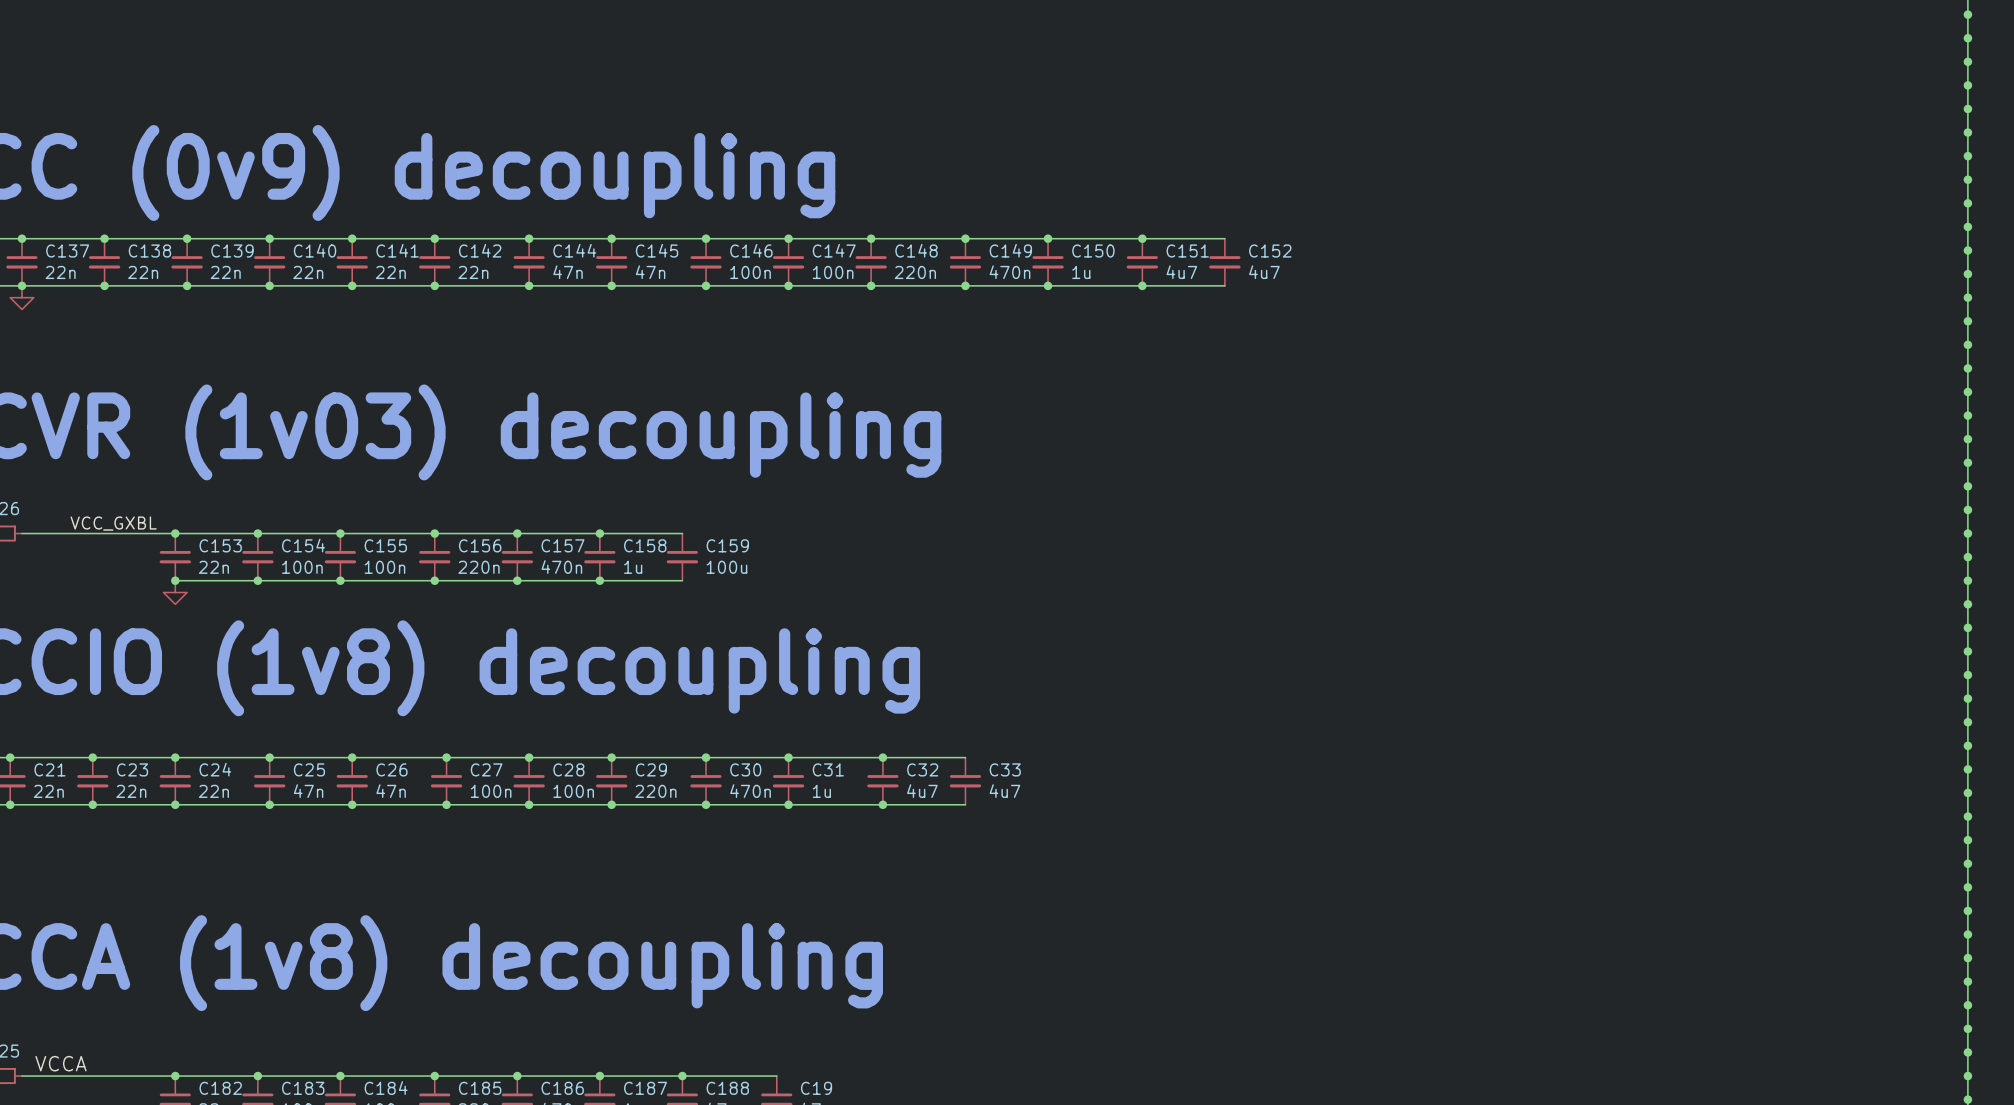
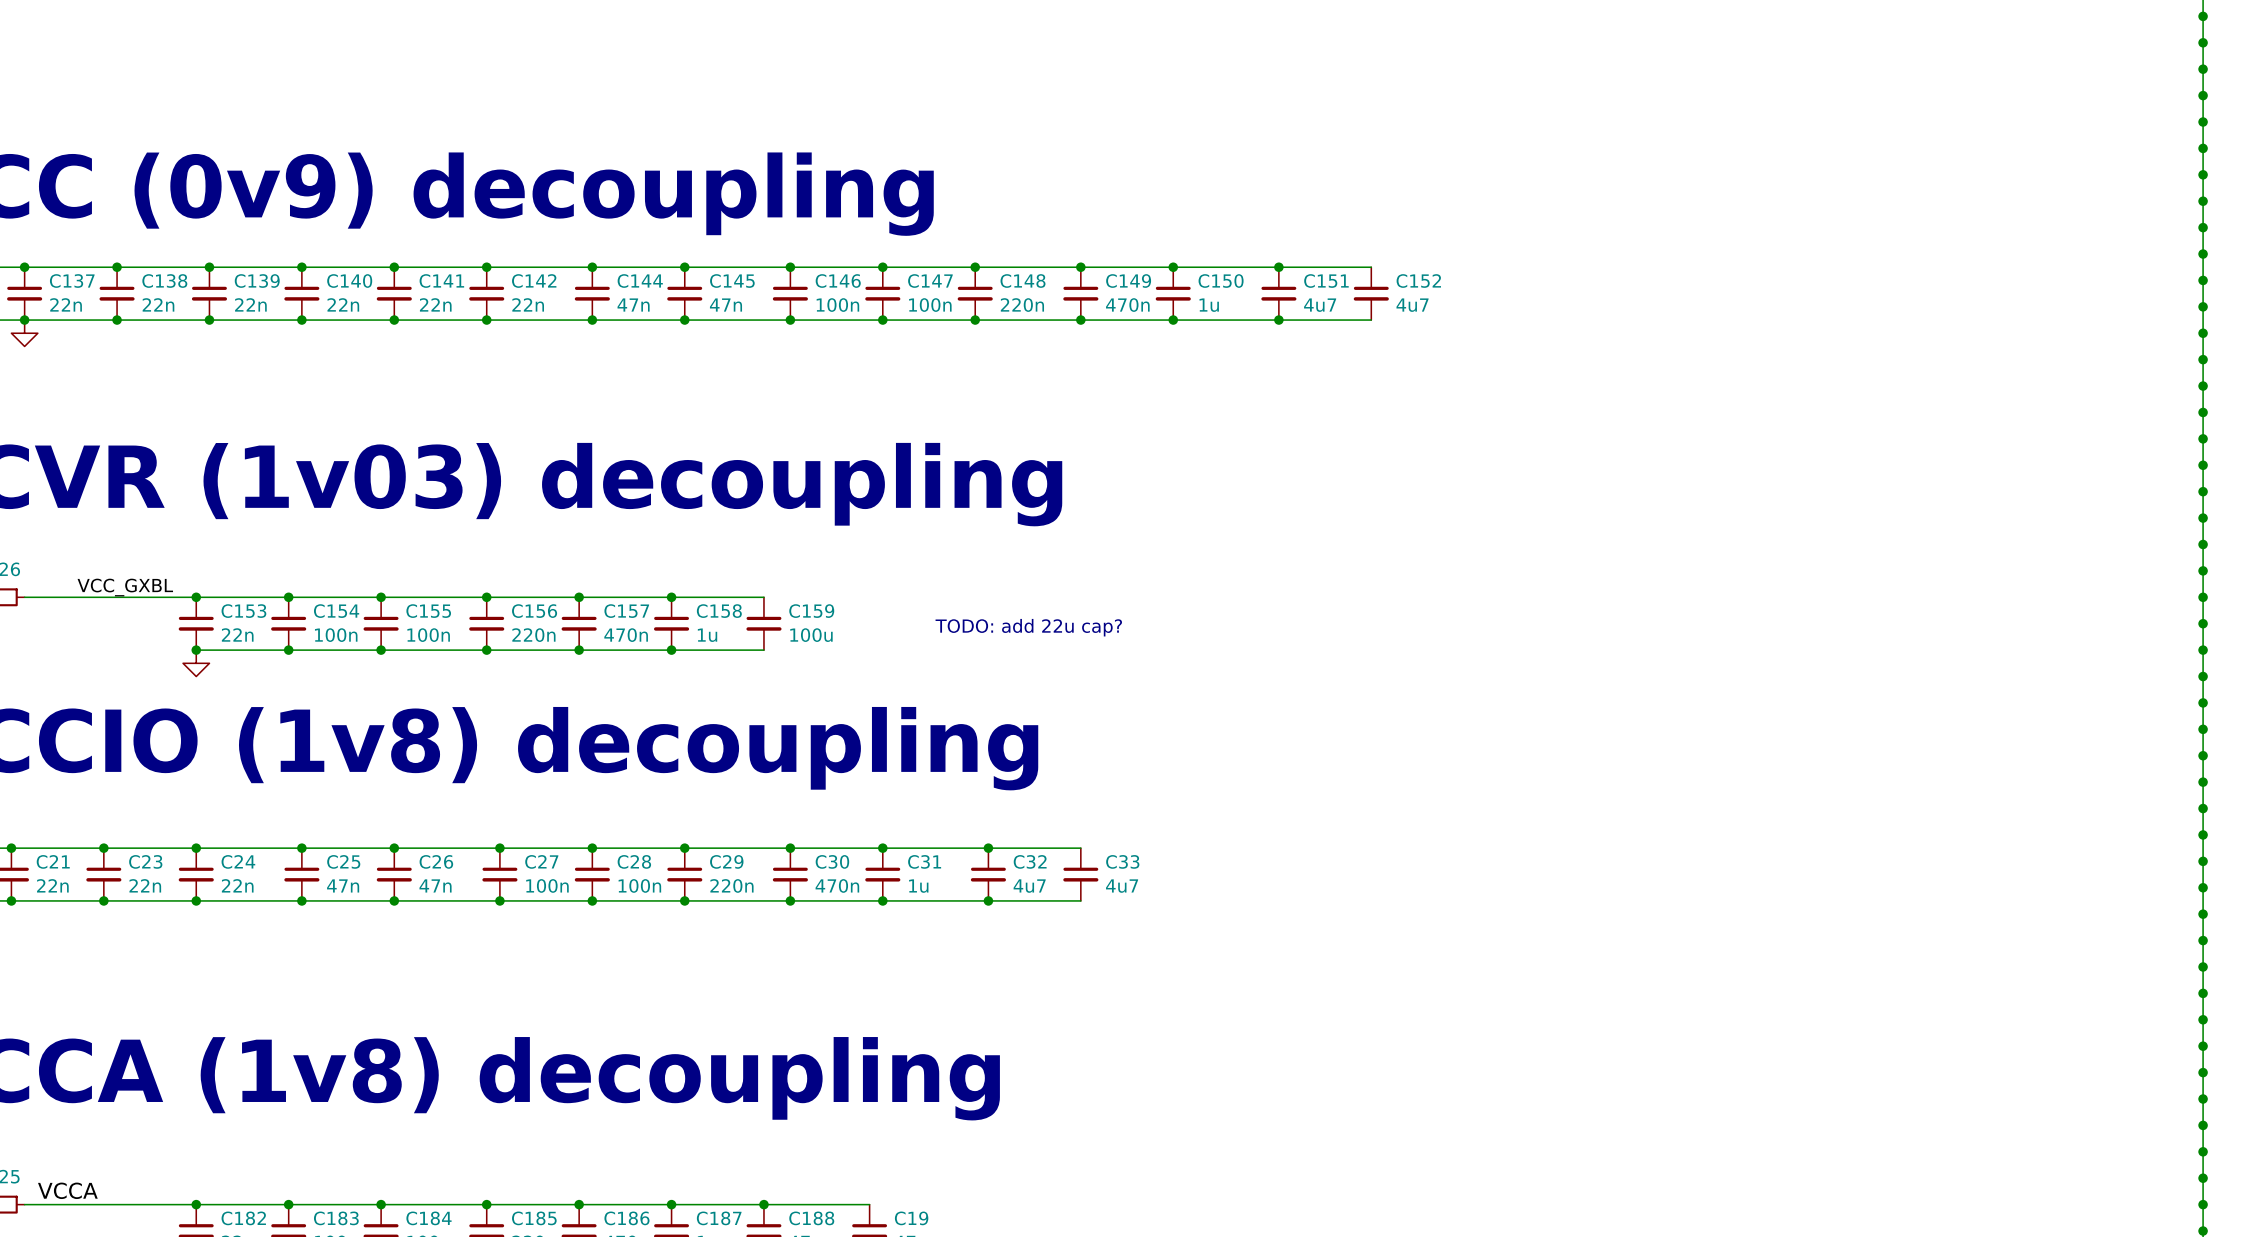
text: none -> TODO: add 22u cap? (1028, 627)

